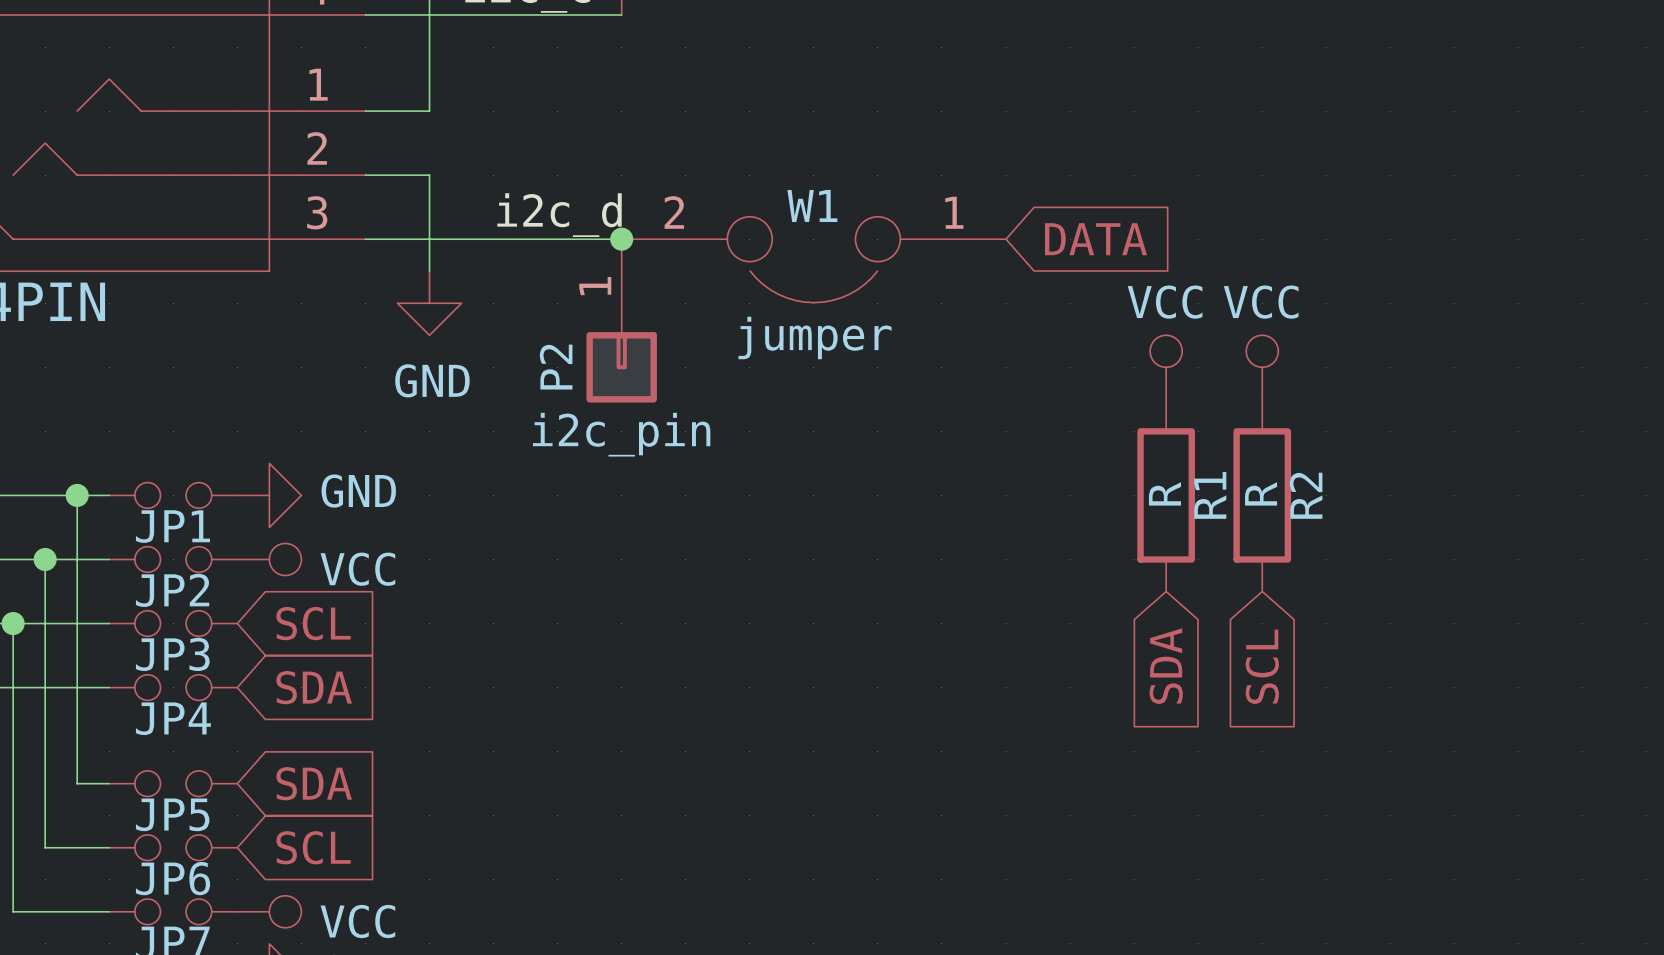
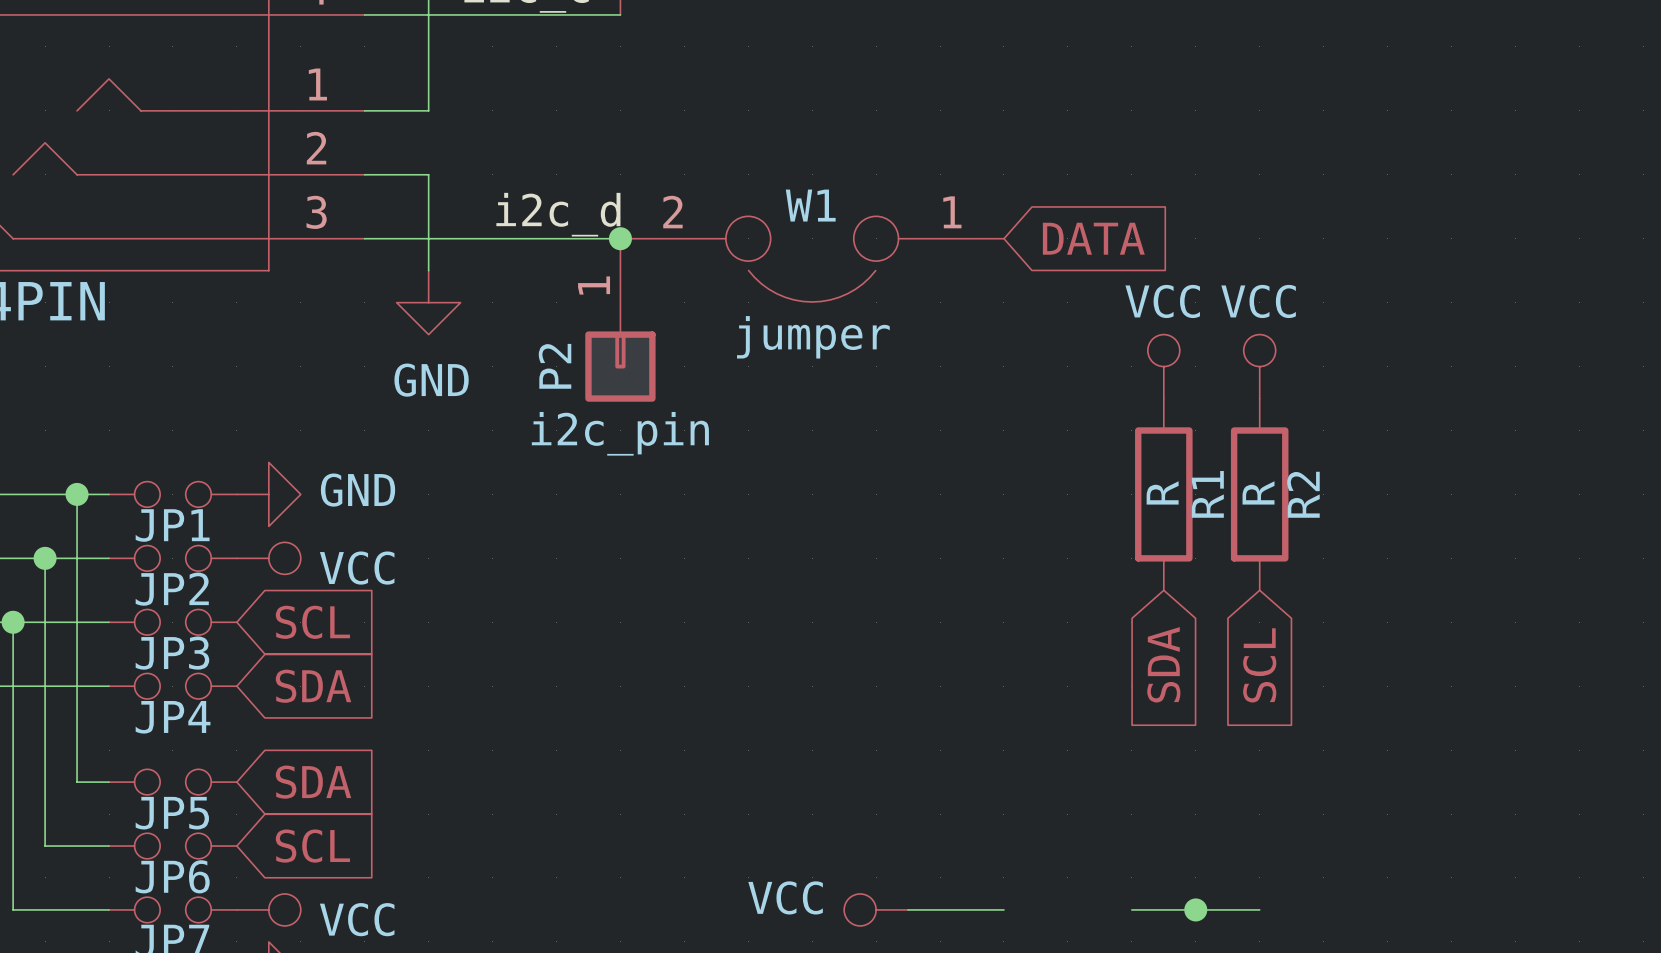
power symbol: none -> VCC (876, 909)
wire: none -> (908, 909) (1003, 909)
wire: none -> (1131, 909) (1259, 909)
junction: none -> (1195, 909)

